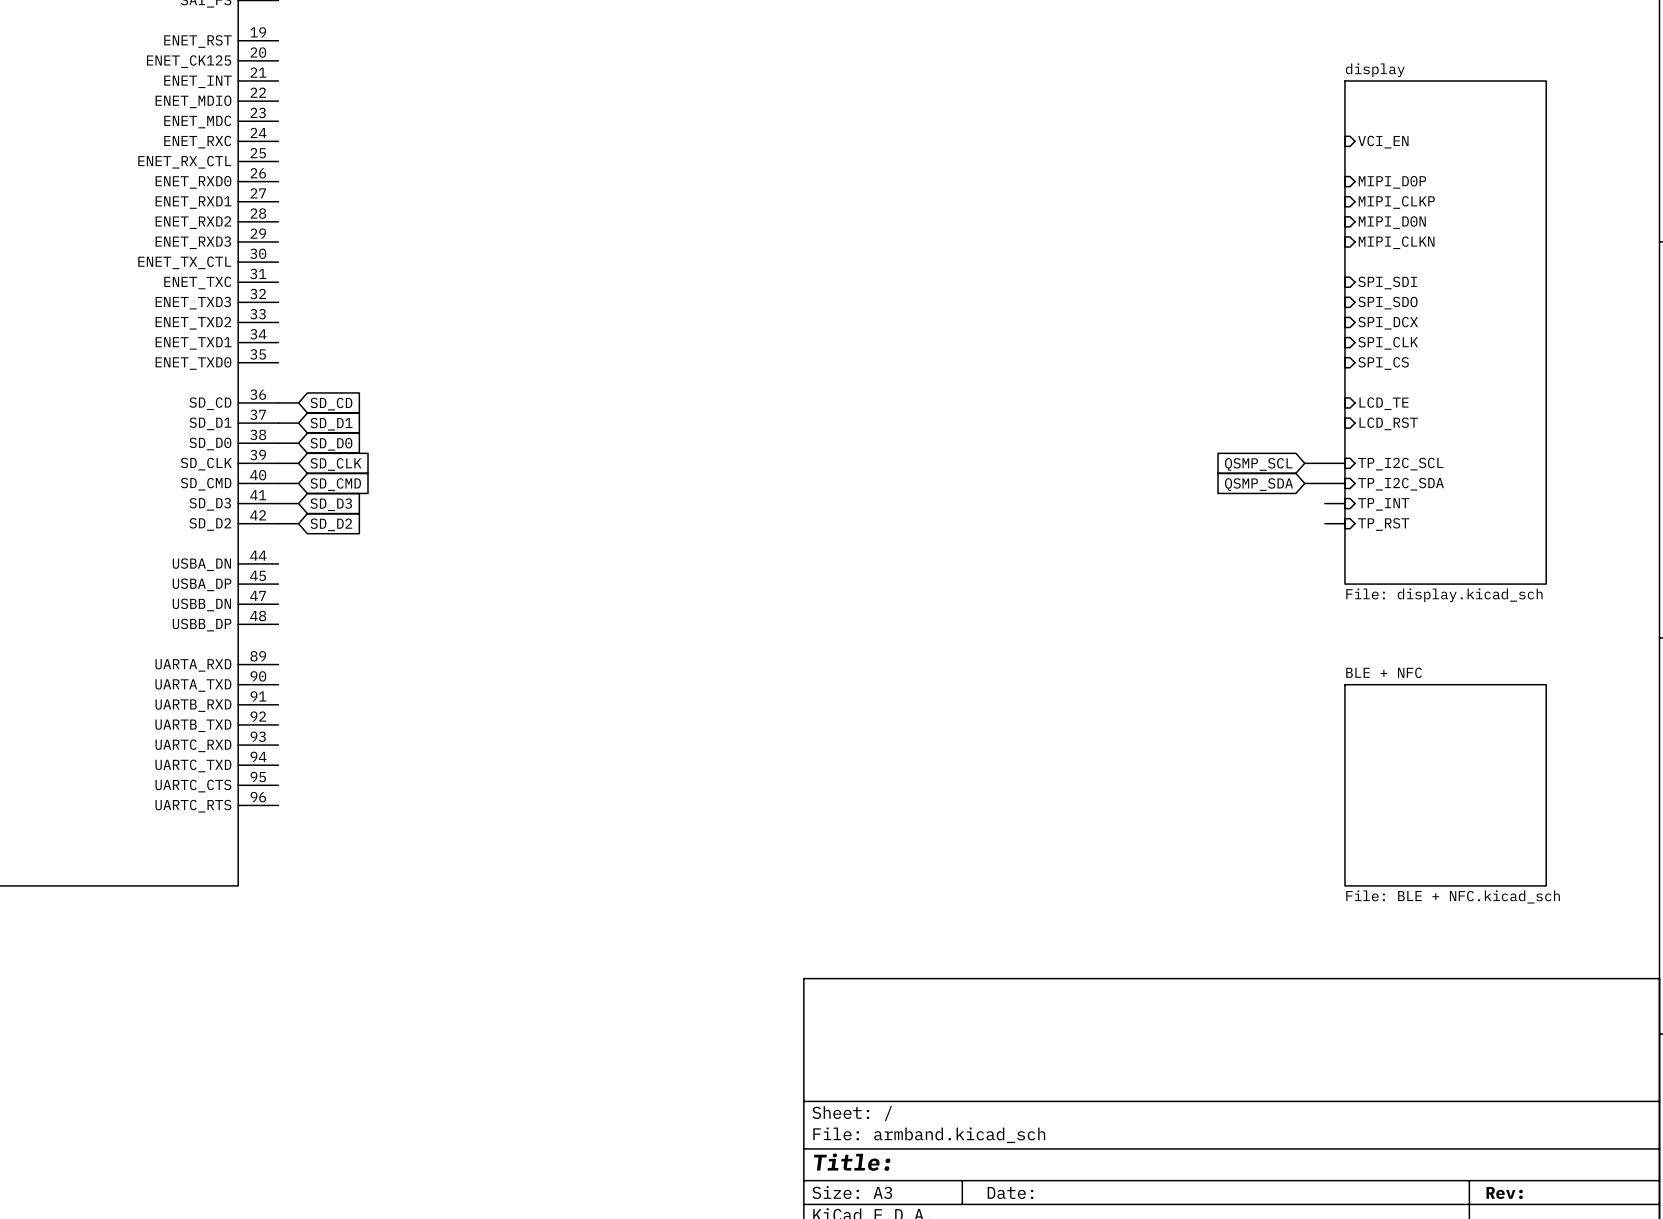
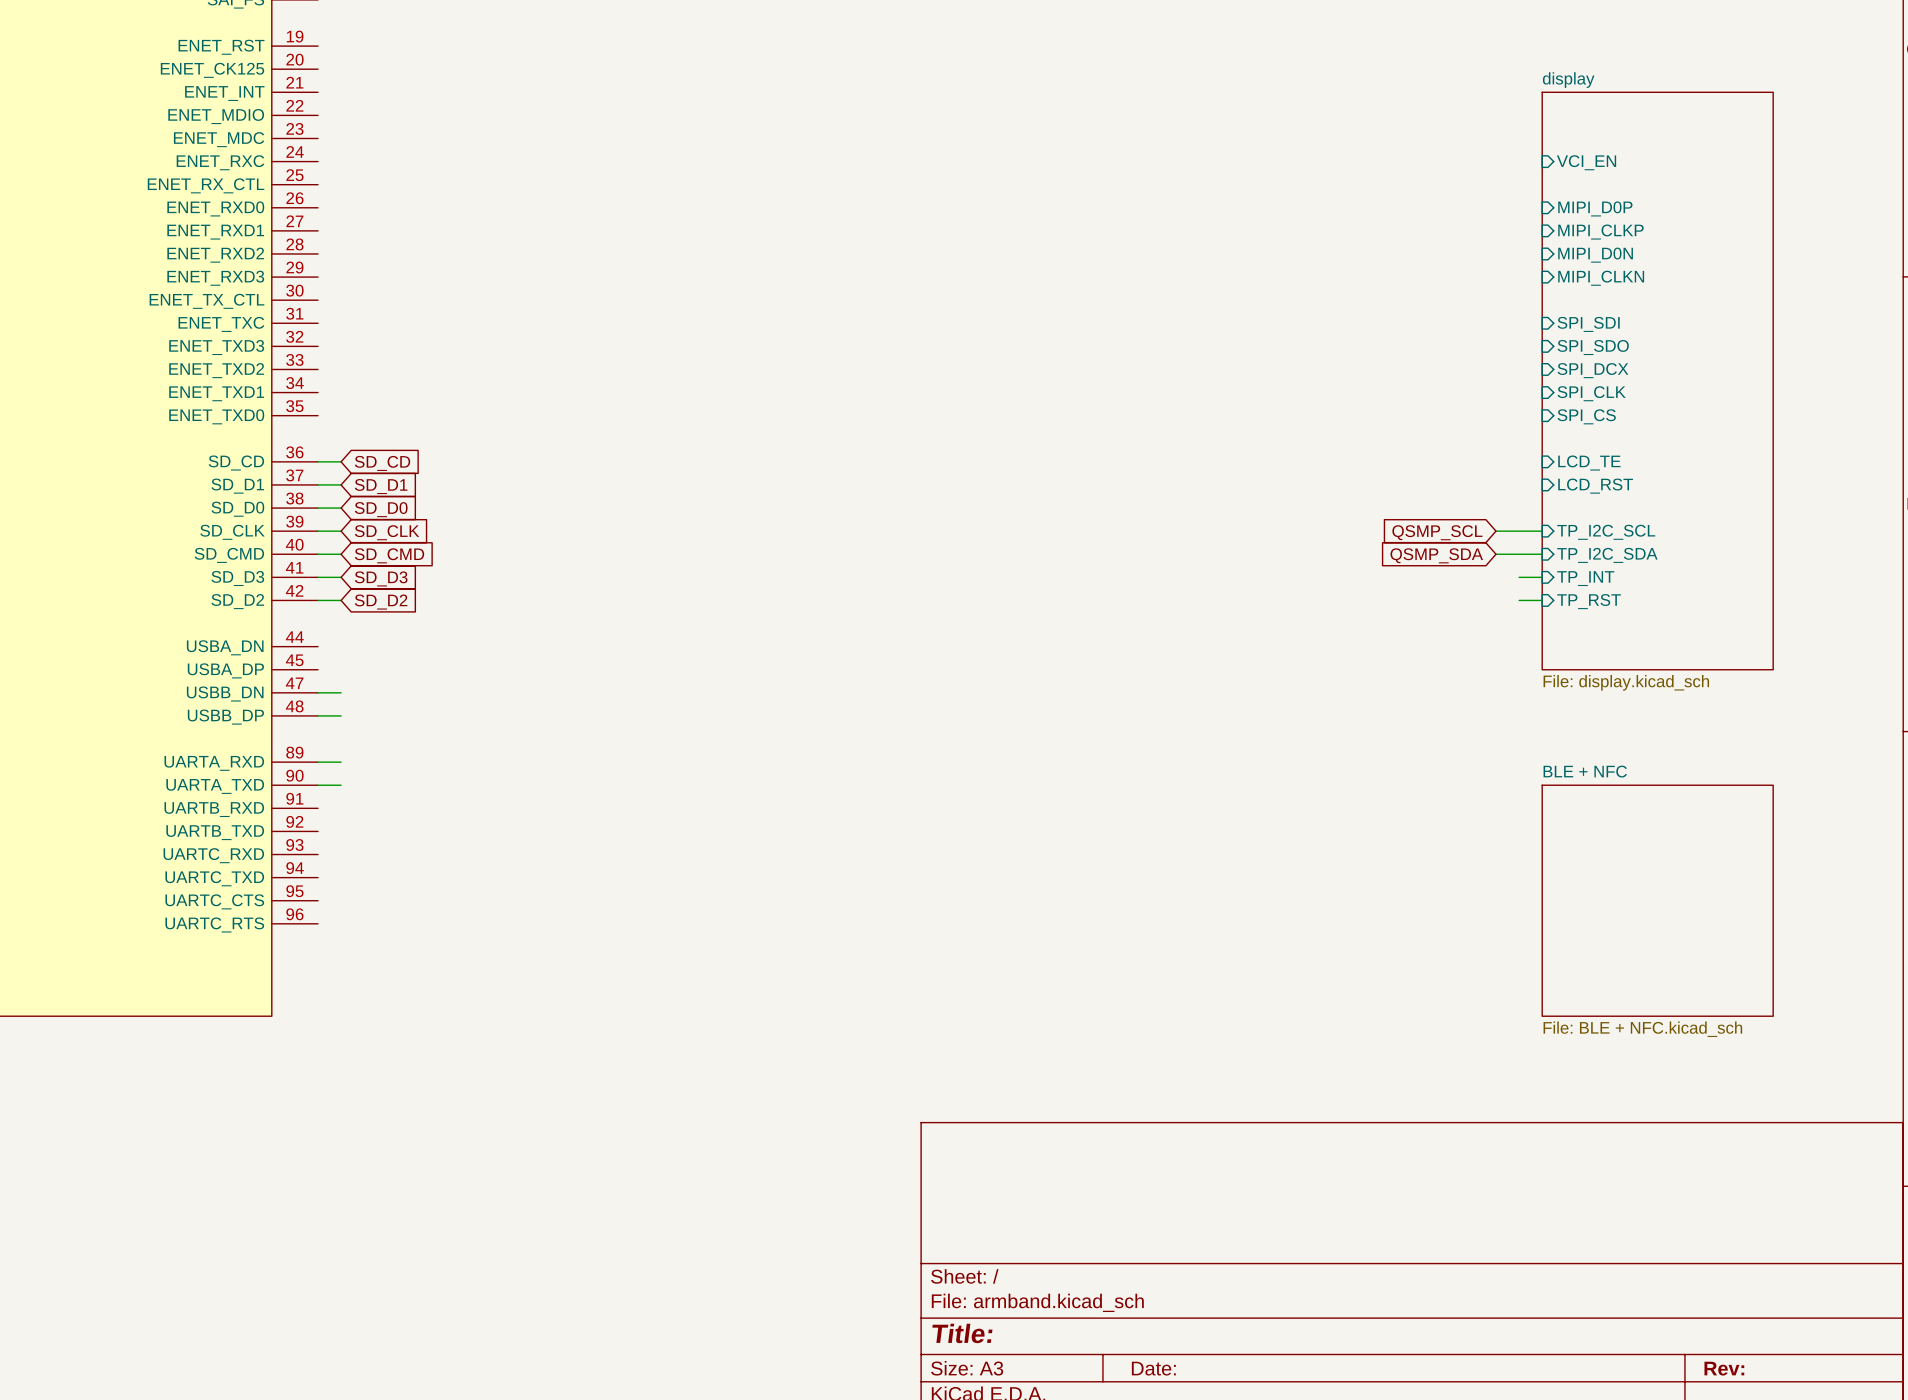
wire: none -> (318, 692) (341, 692)
wire: none -> (318, 715) (341, 715)
wire: none -> (318, 762) (341, 762)
wire: none -> (318, 785) (341, 785)

